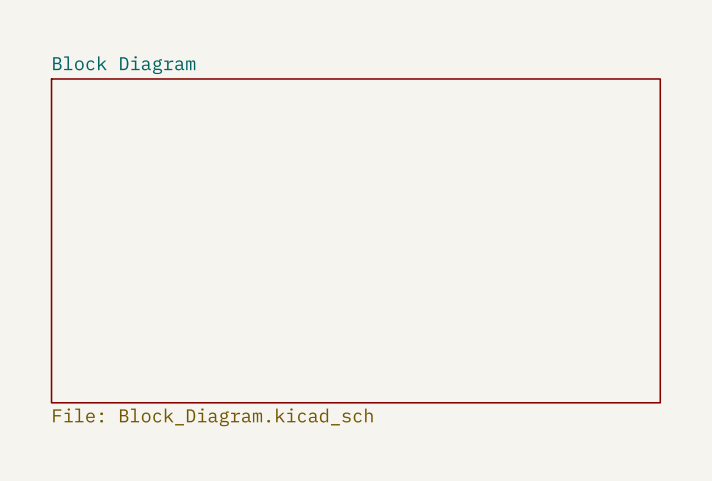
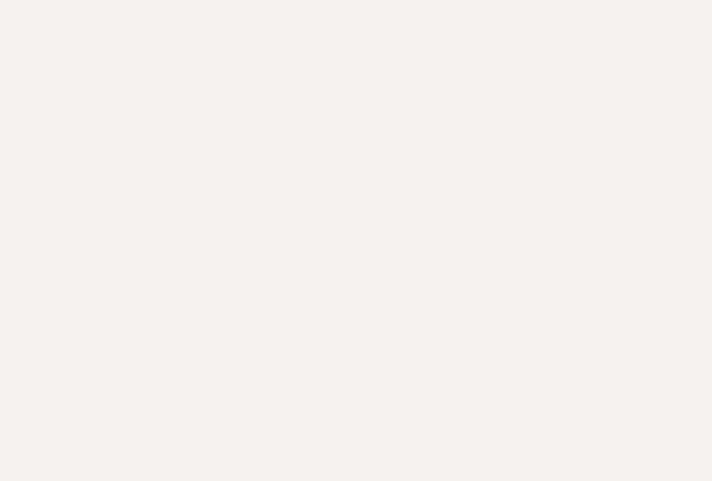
sheet Block Diagram: File: Block_Diagram.kicad_sch (355, 240) -> none

